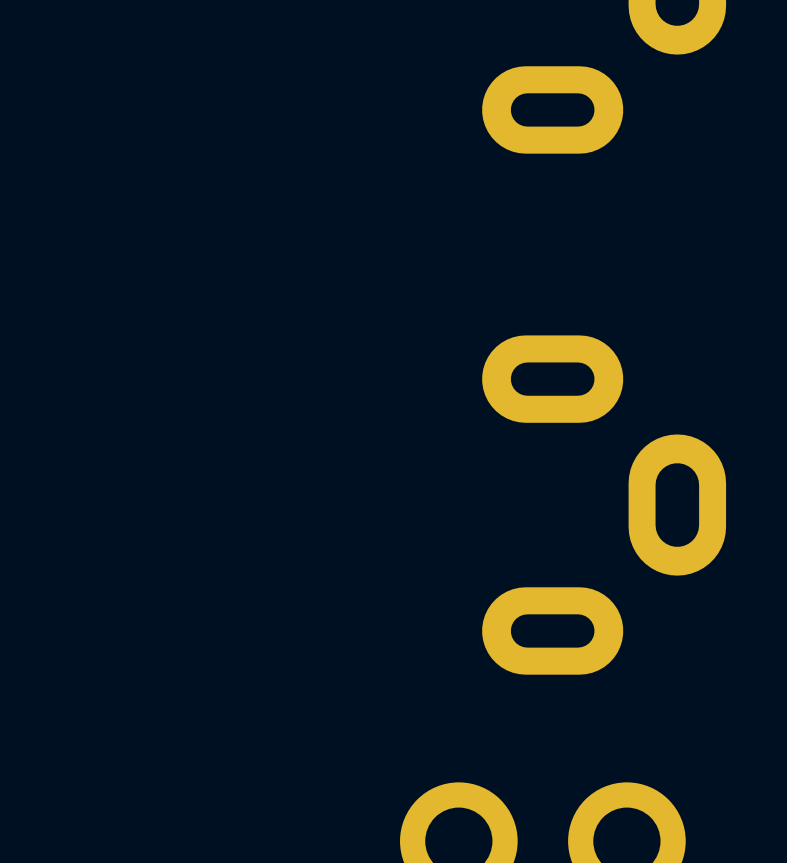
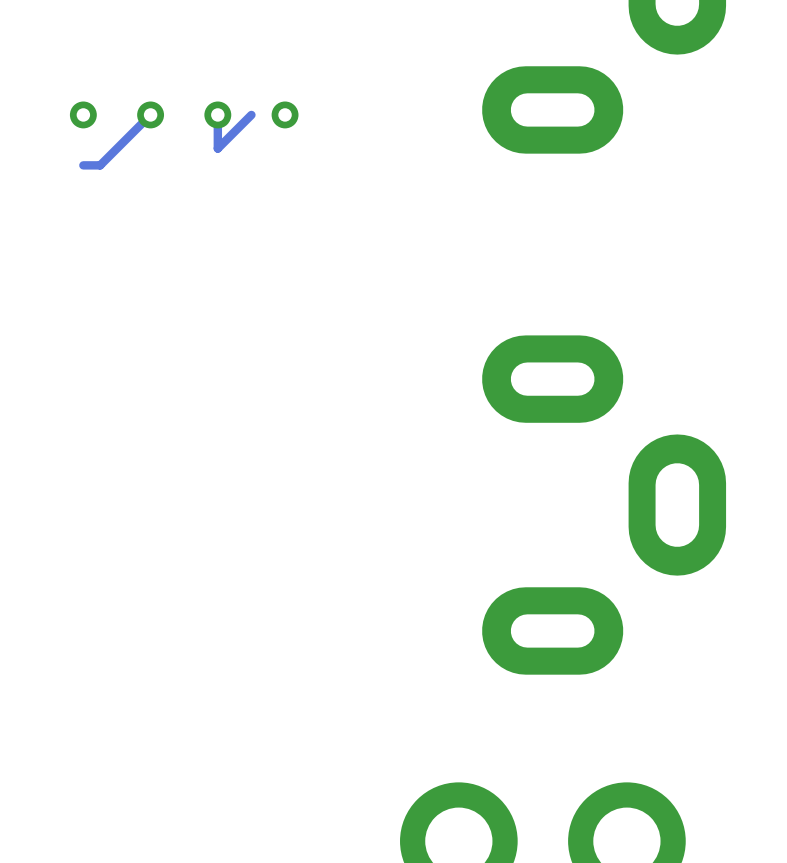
via: none -> (83, 114)
track: none -> (150, 114) (100, 165) (83, 165)
via: none -> (150, 114)
via: none -> (217, 114)
track: none -> (251, 114) (217, 148) (217, 114)
via: none -> (285, 114)

